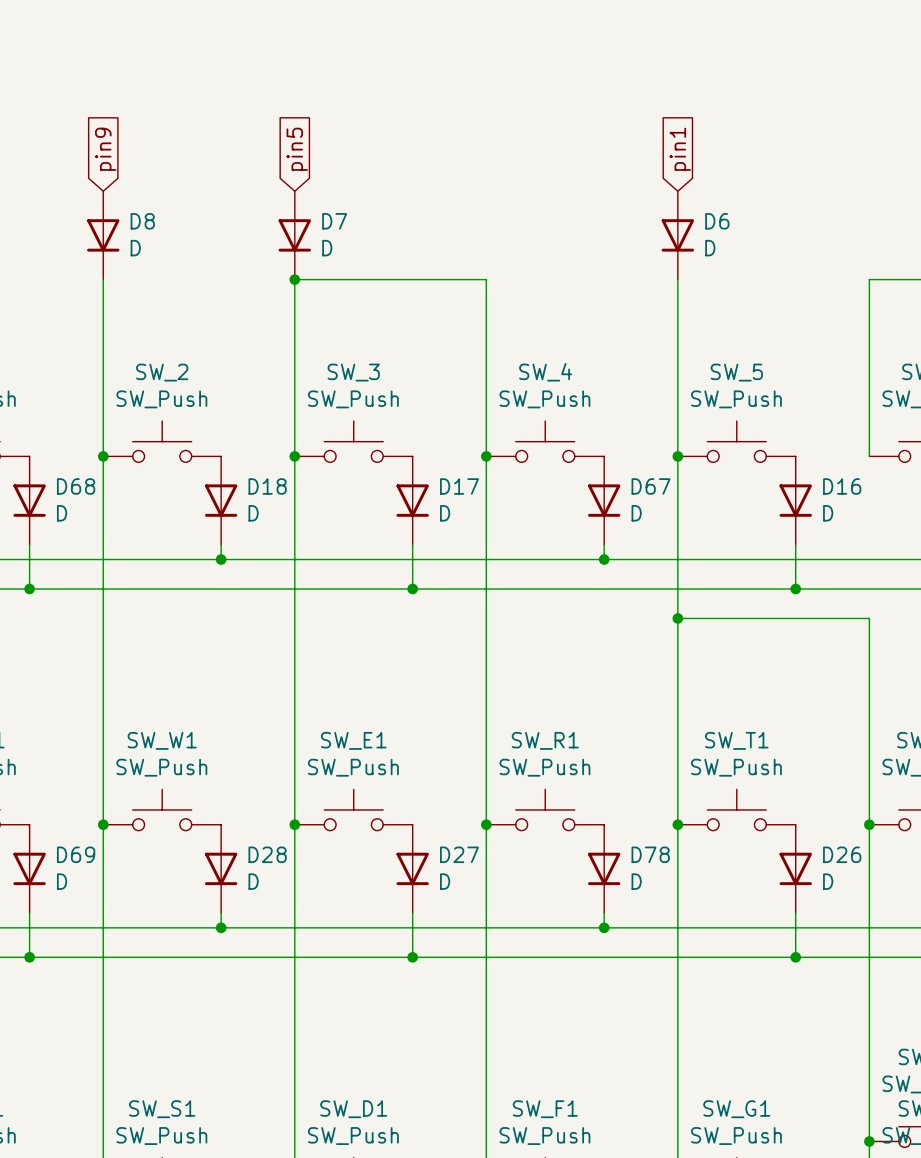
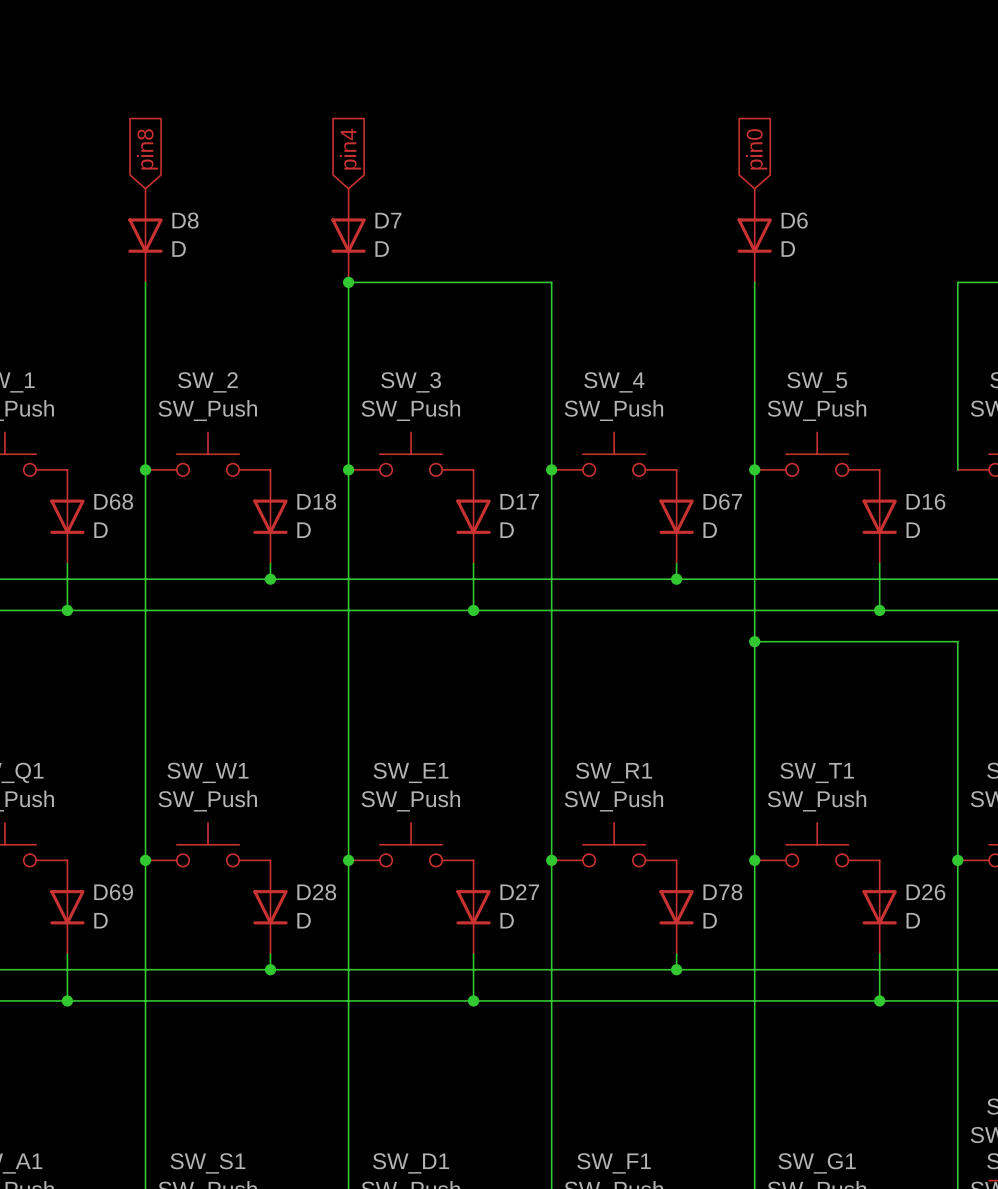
global label: pin9 (105, 149) -> pin8 (147, 149)
global label: pin5 (297, 149) -> pin4 (350, 149)
global label: pin1 (680, 149) -> pin0 (756, 149)

